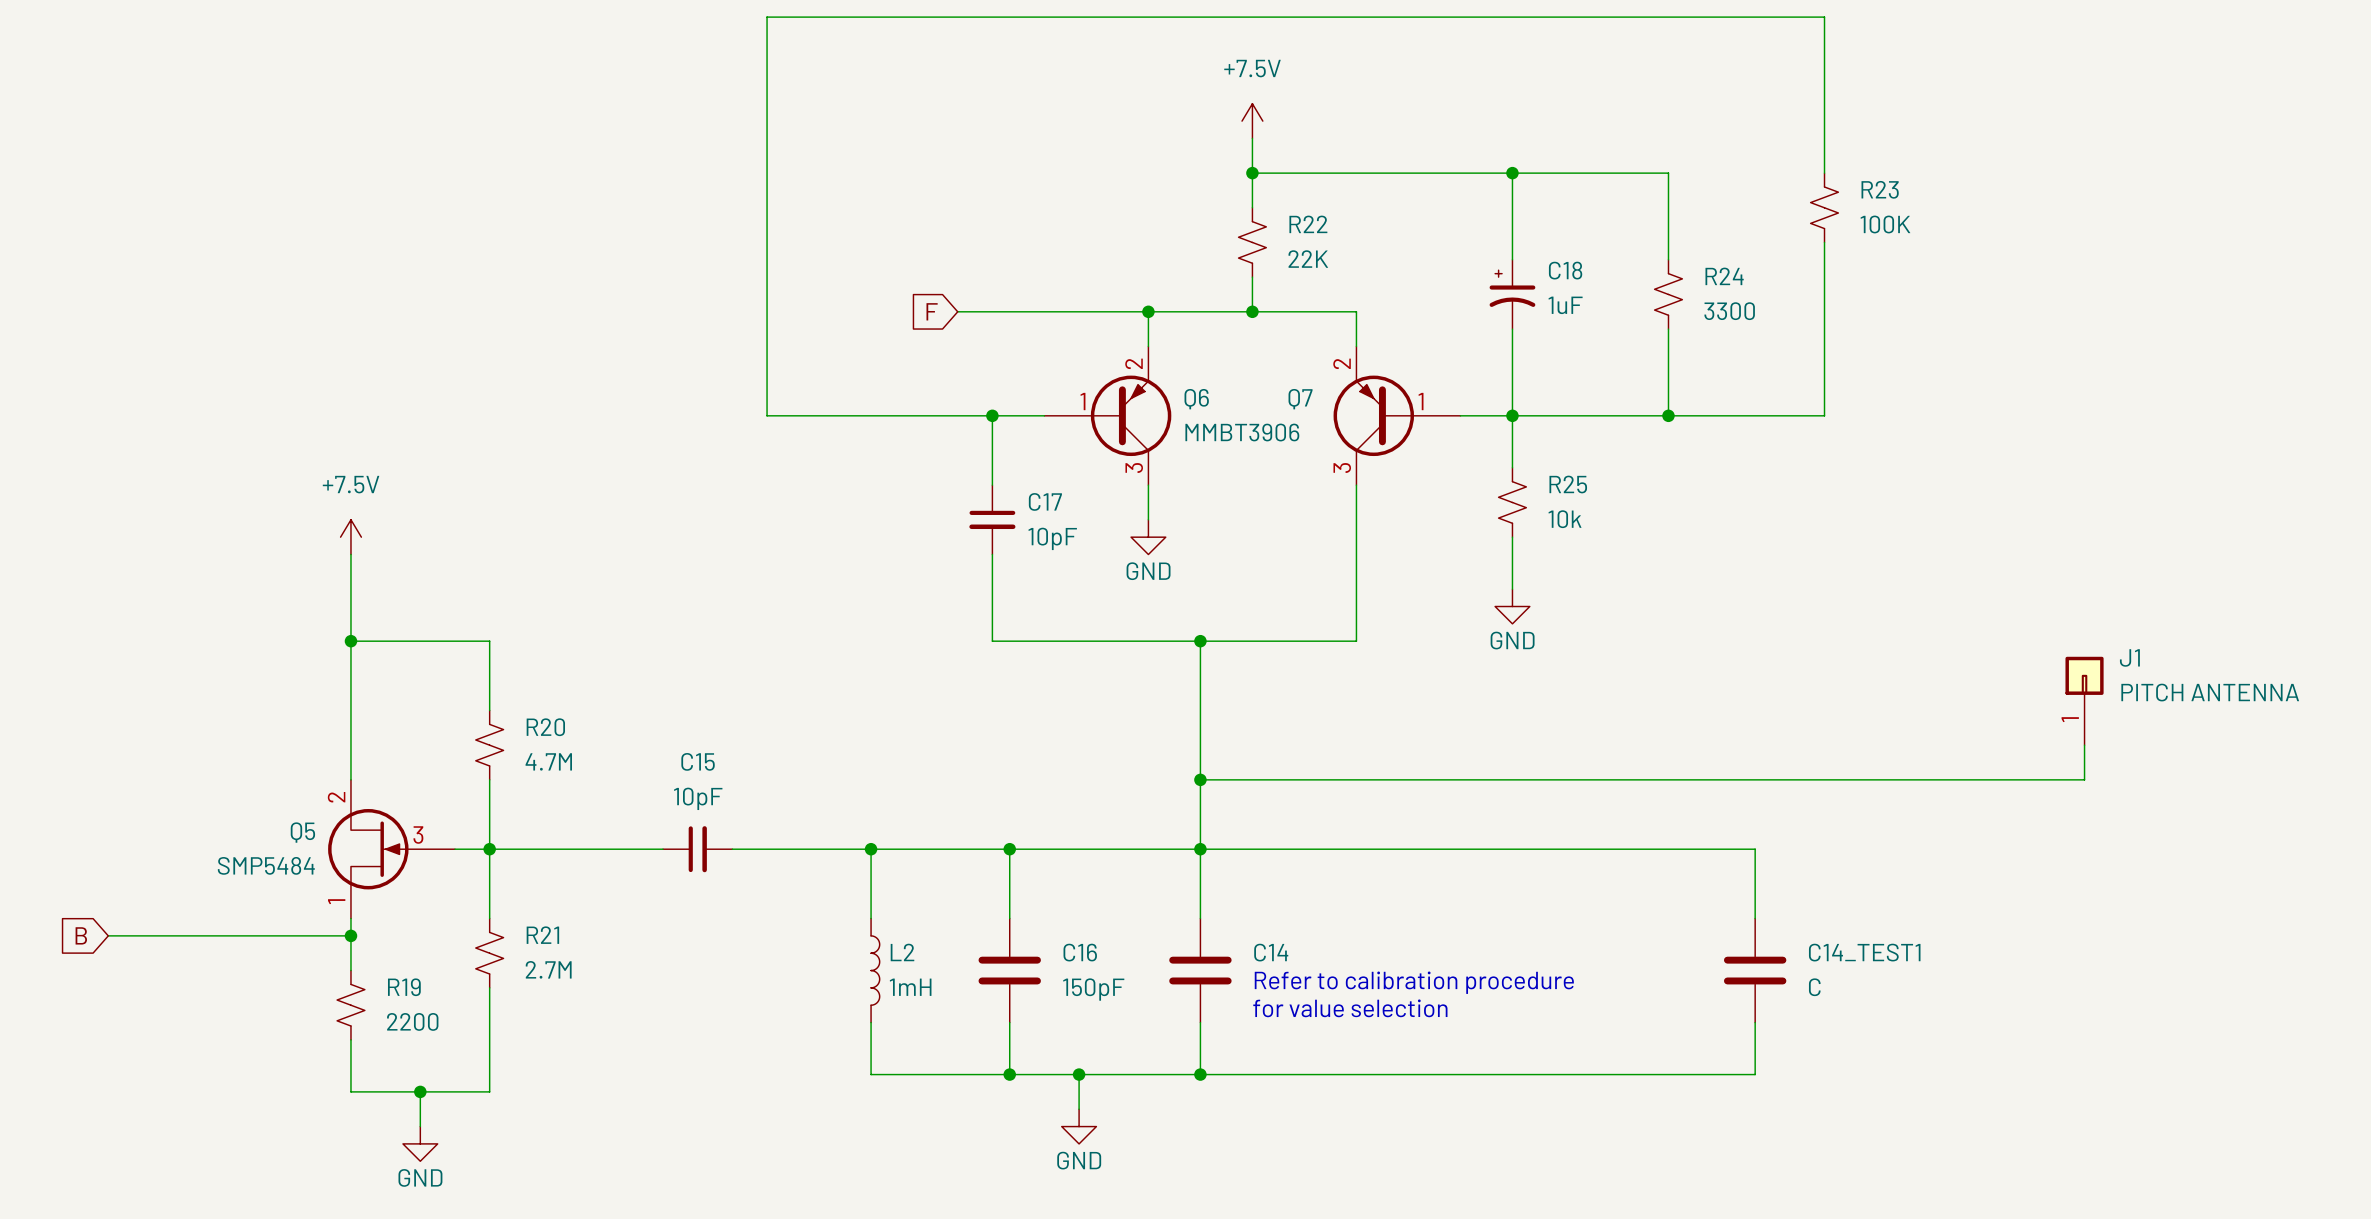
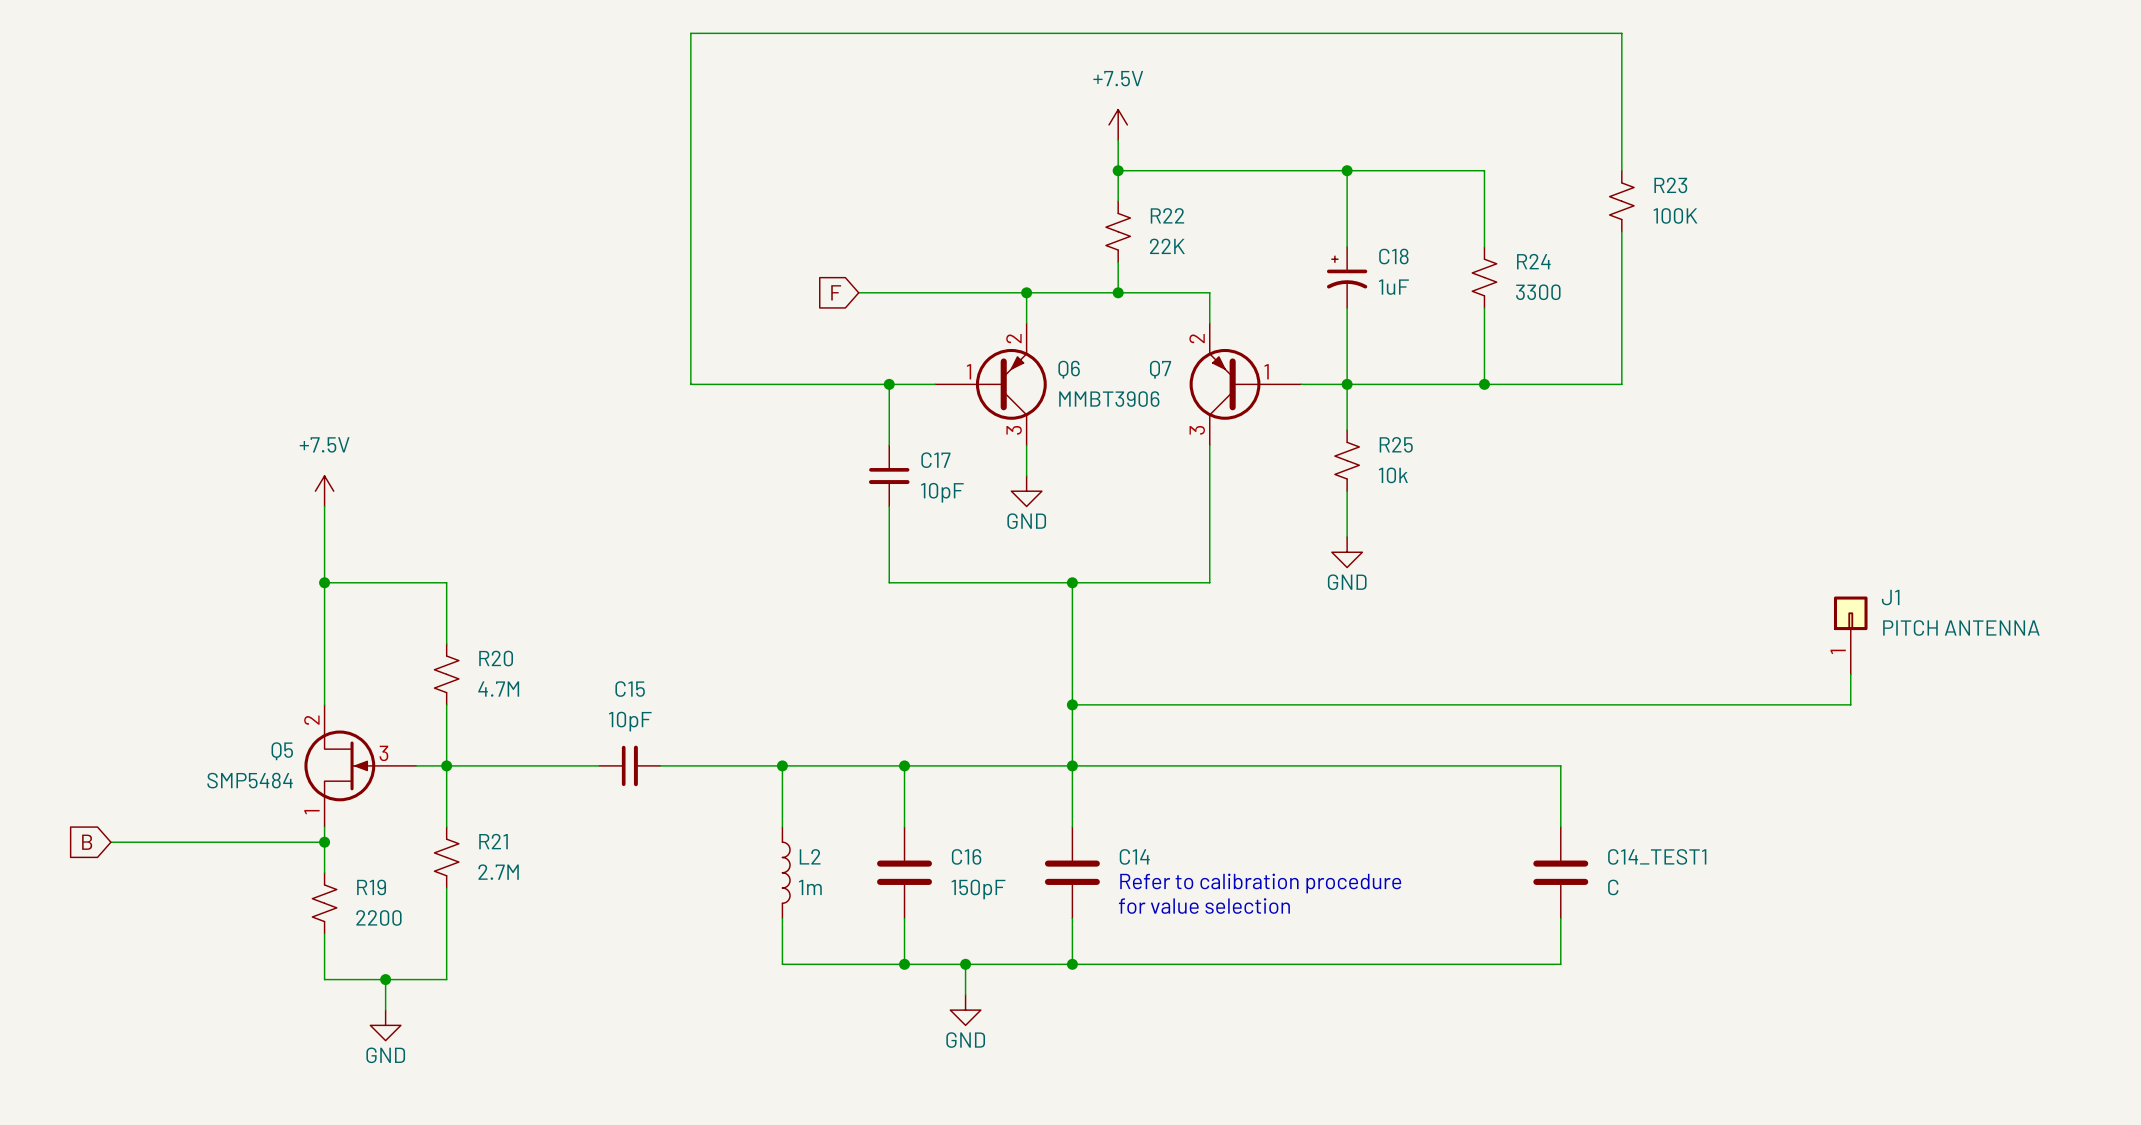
L2 value: 1mH (910, 987) -> 1m (810, 887)

